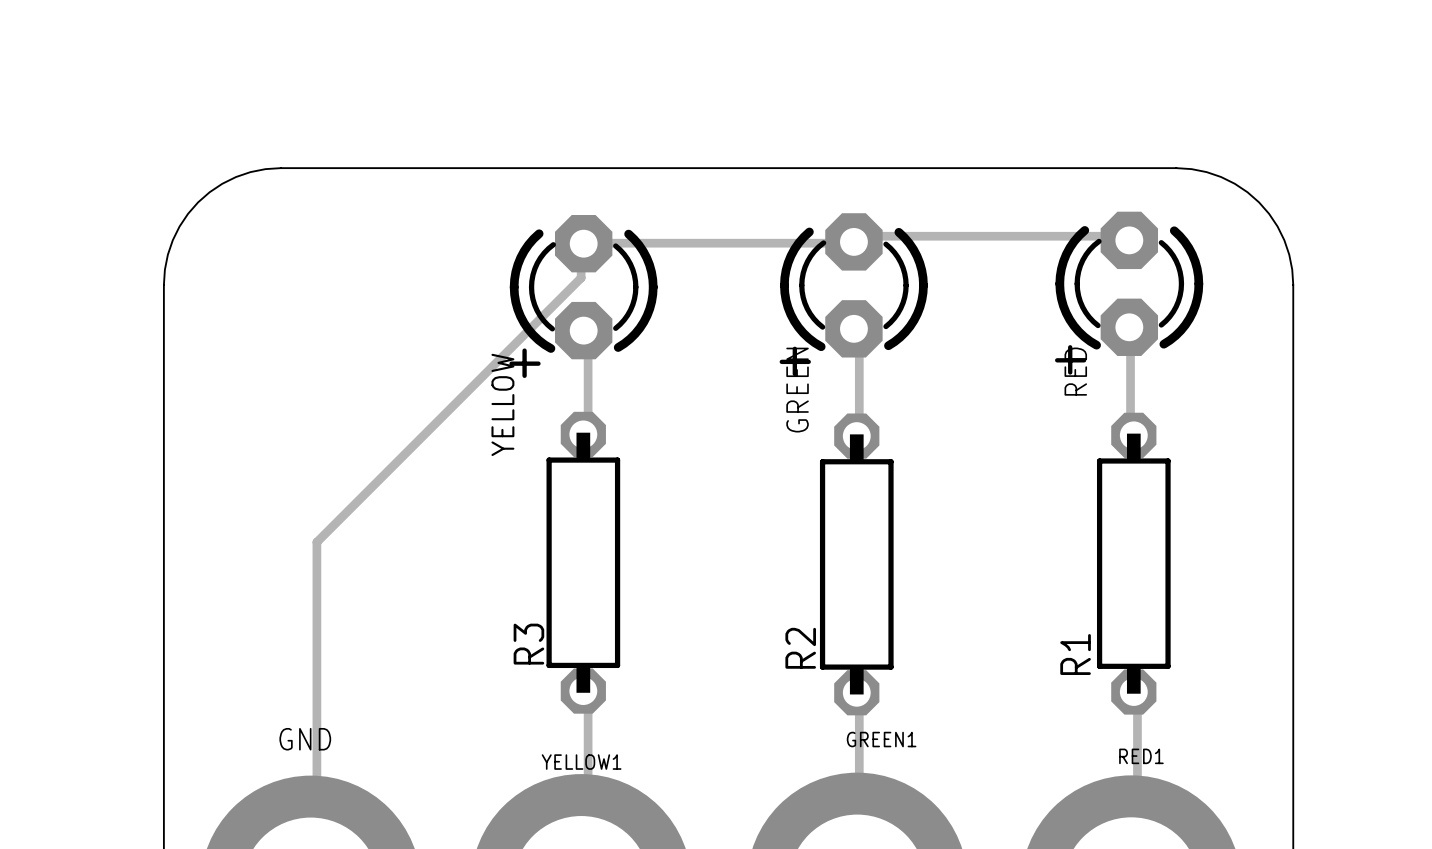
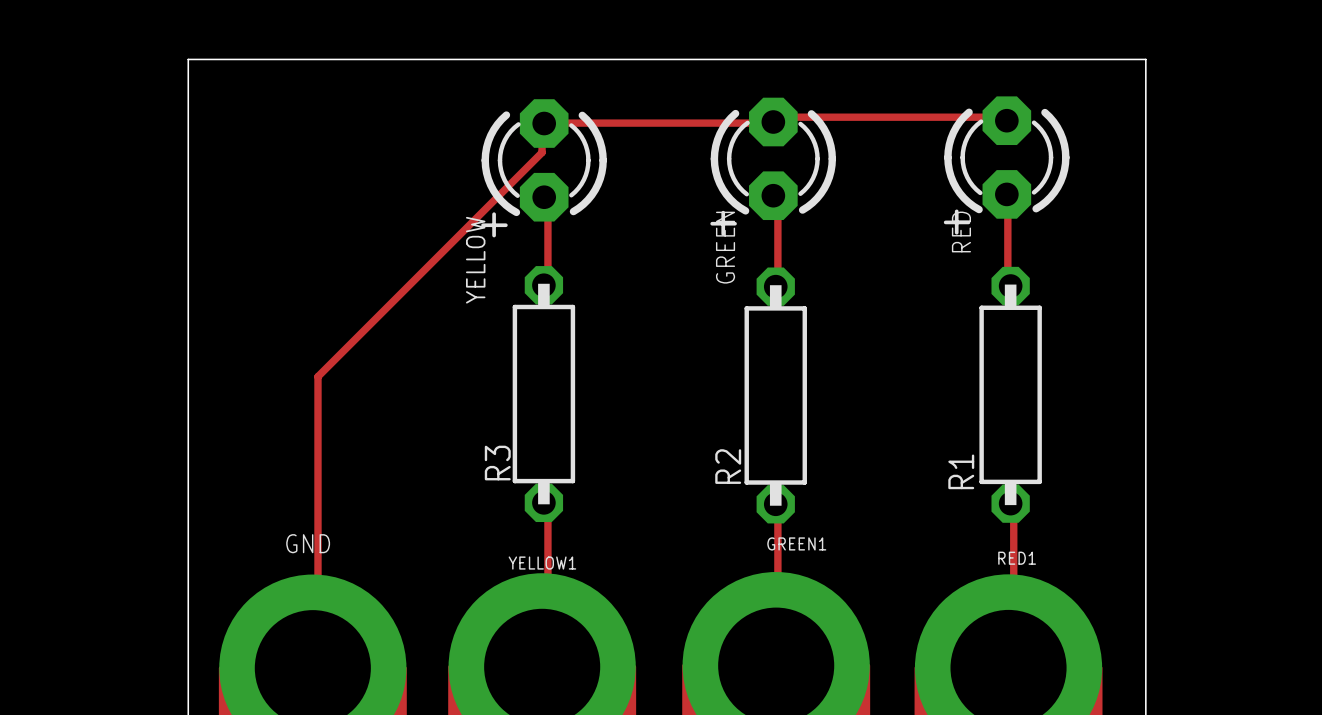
board edge: (280, 168) (250, 172) (236, 177) (209, 192) (198, 202) (188, 213) (172, 240) (167, 254) (163, 284) -> (287, 59) (188, 59) (188, 158)
board edge: (1176, 168) (1206, 172) (1221, 177) (1247, 192) (1259, 202) (1269, 213) (1284, 240) (1289, 254) (1293, 284) -> (1046, 59) (1145, 59) (1145, 158)

